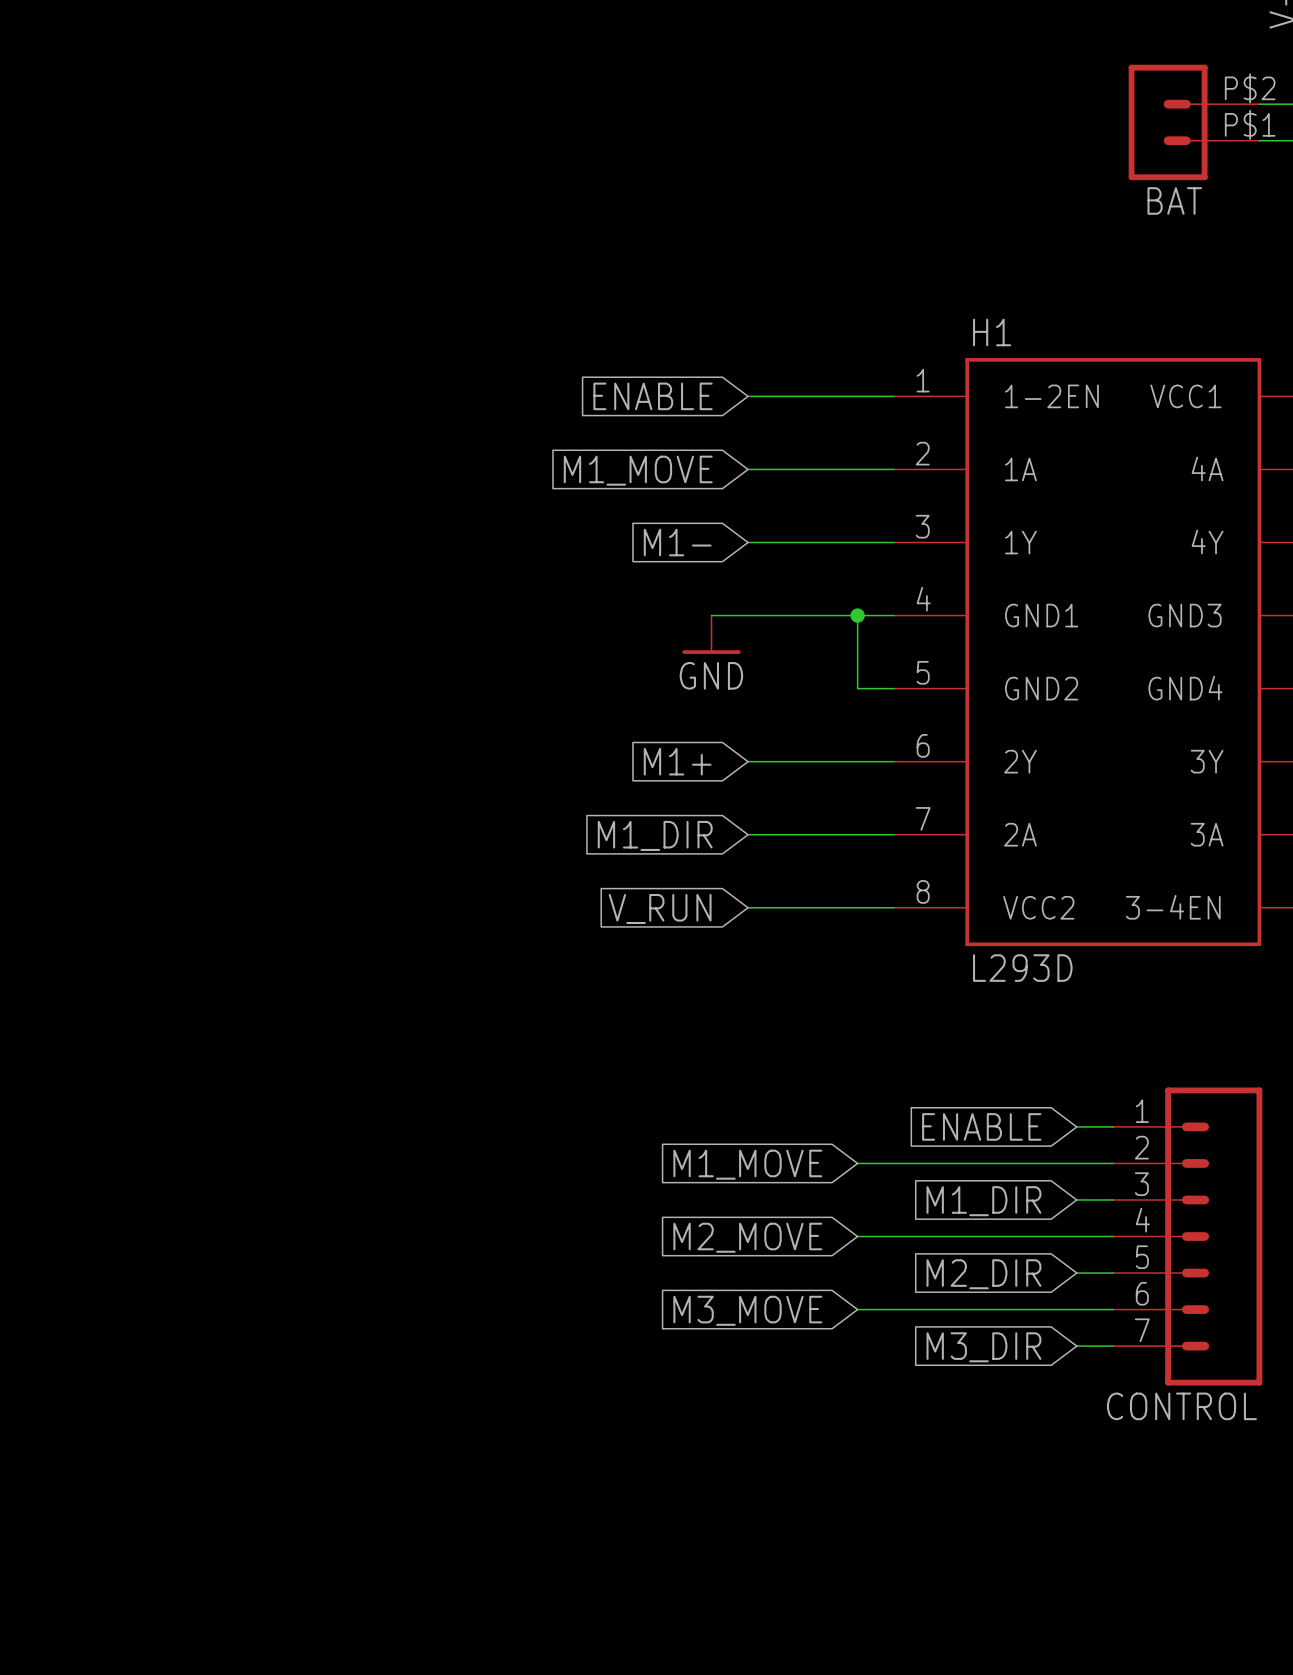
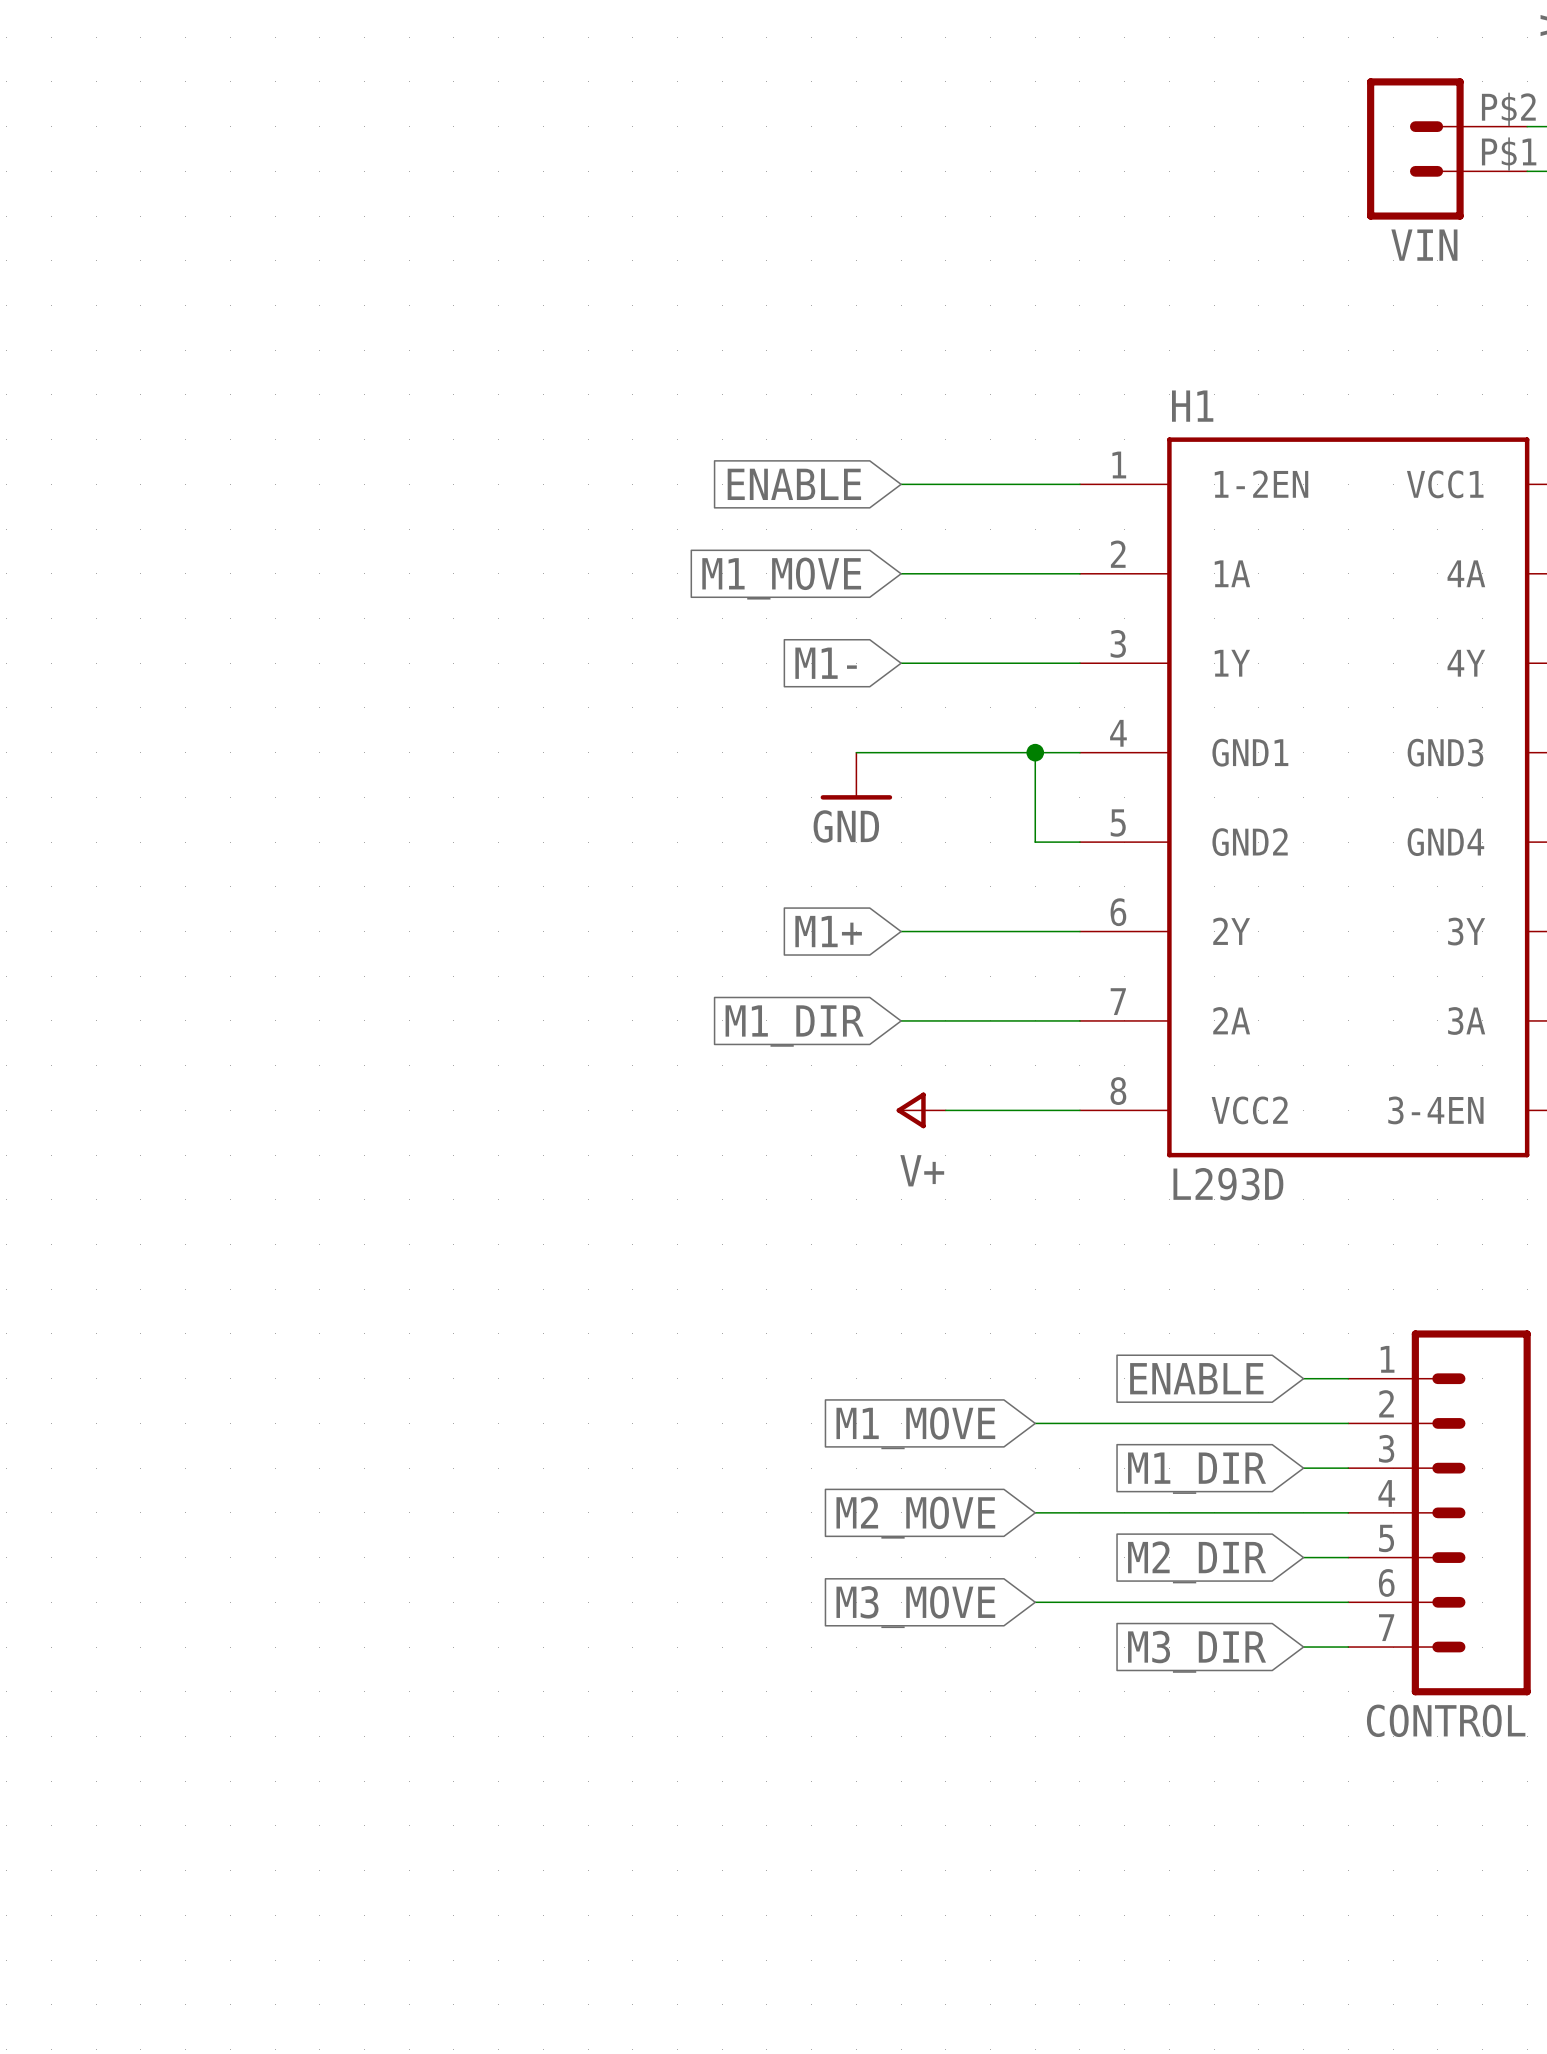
BAT name: BAT (1174, 200) -> VIN (1424, 245)
power symbol: none -> V+ (921, 1110)
global label: V_RUN (660, 908) -> none

